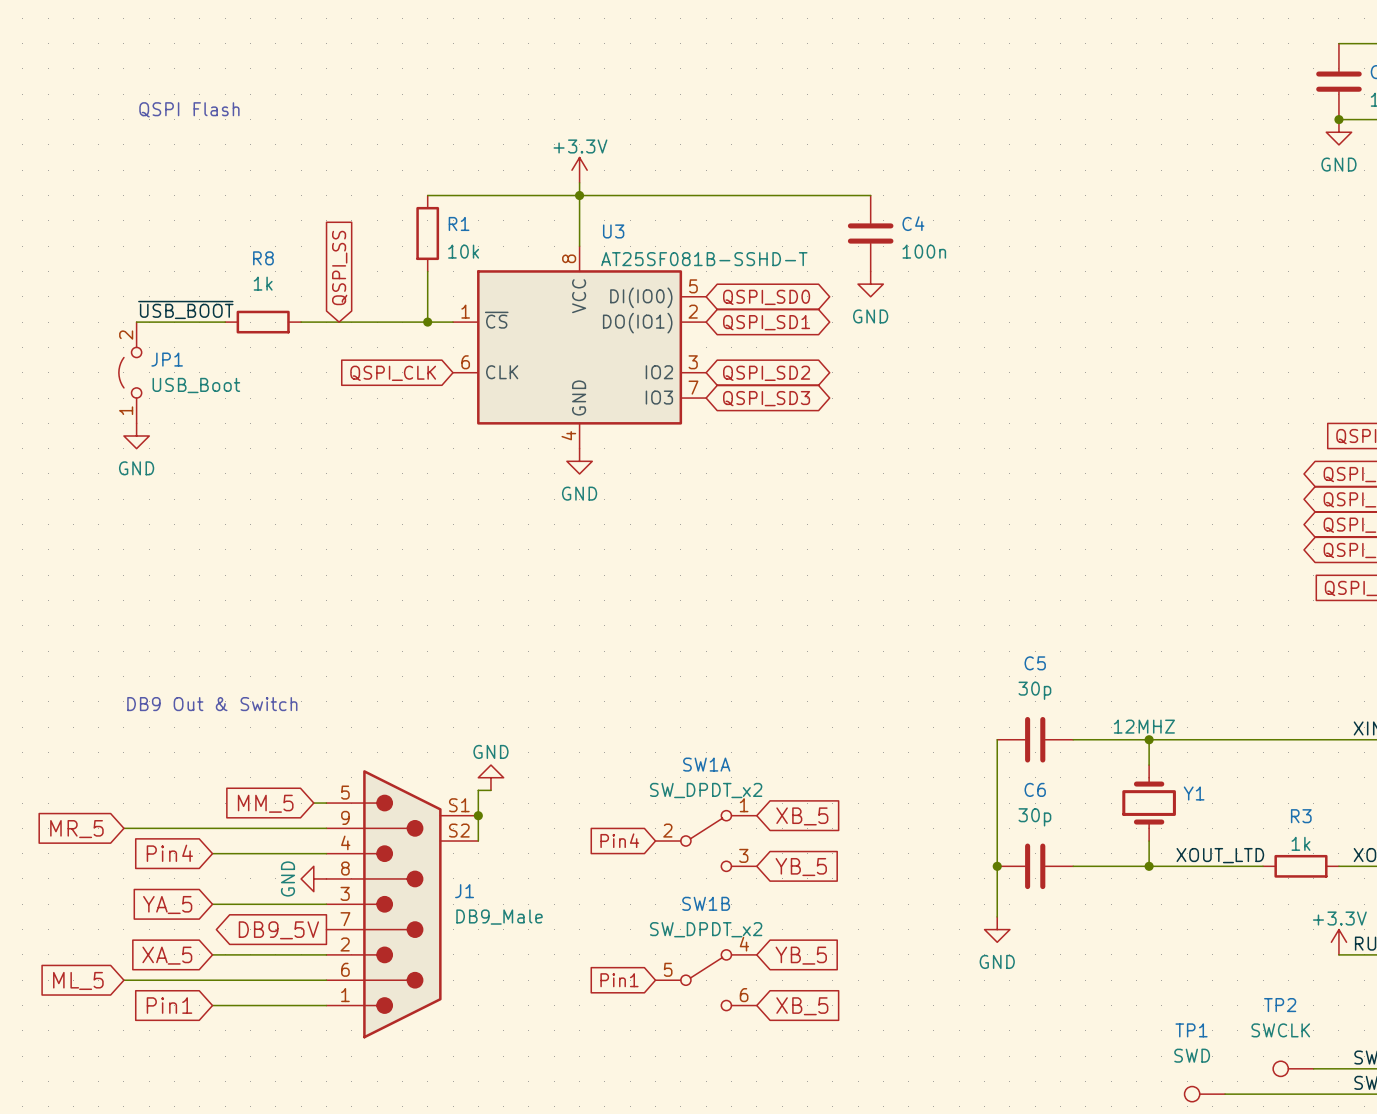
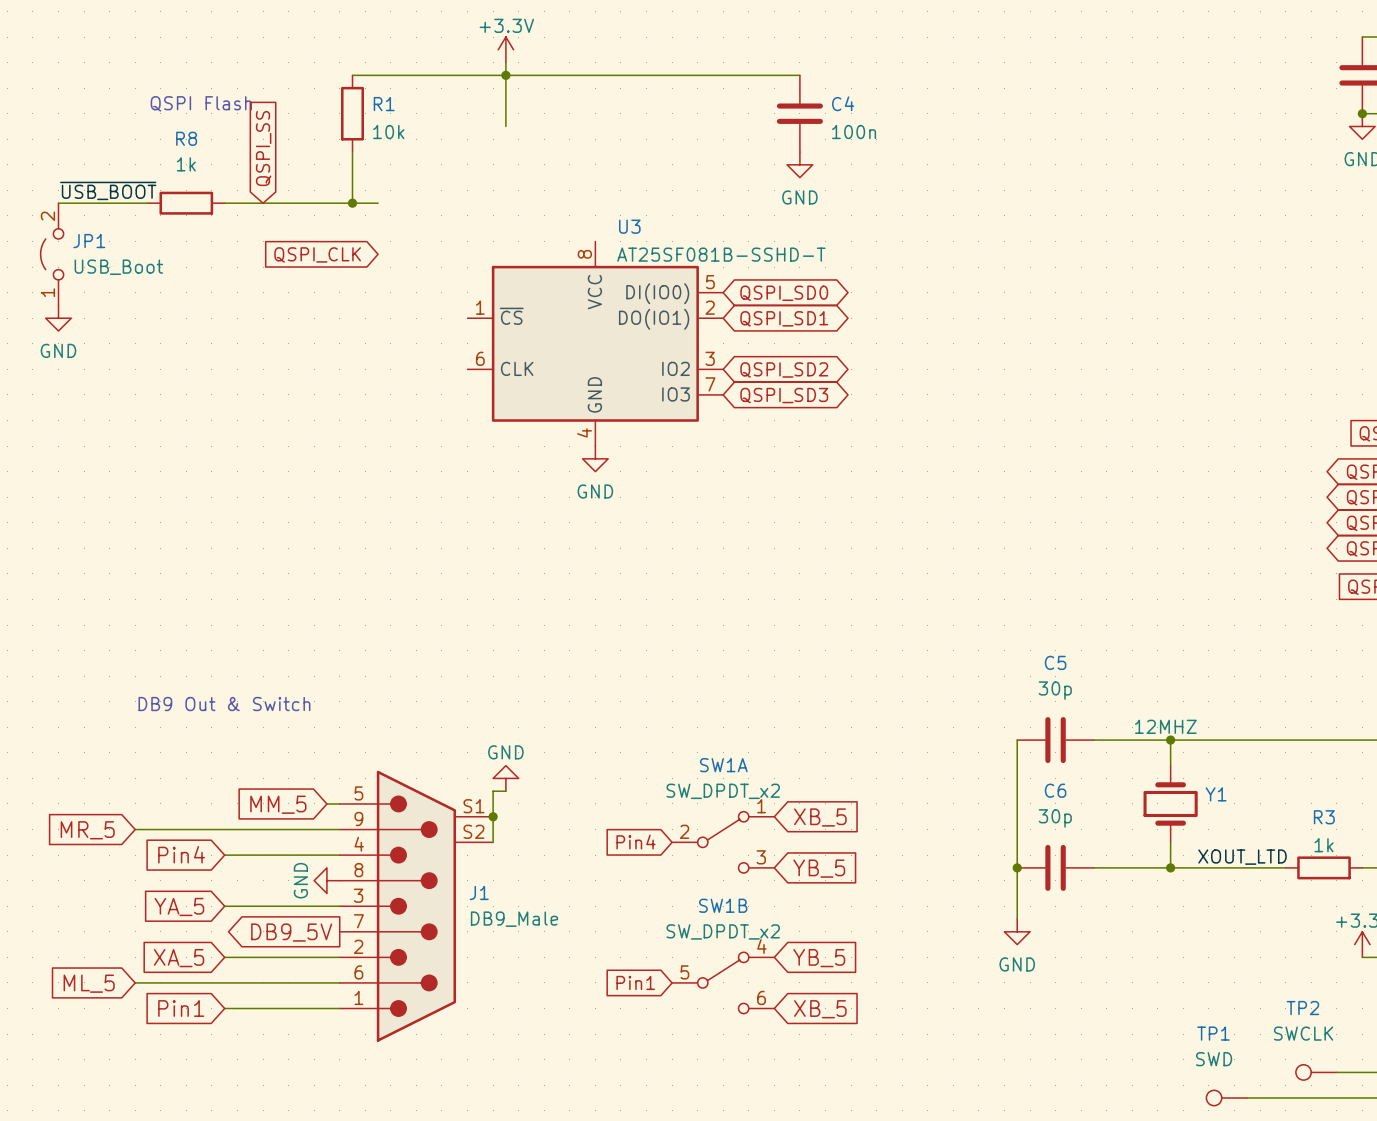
junction: none -> (505, 75)
power symbol position: +3.3V (579, 170) -> +3.3V (505, 49)
wire: (579, 182) (579, 246) -> (505, 62) (505, 126)
wire: (427, 195) (870, 195) -> (352, 75) (799, 75)
junction: (579, 195) -> none
junction: none -> (352, 203)
R1 position: (427, 233) -> (352, 113)
C4 position: (870, 233) -> (799, 113)
global label position: QSPI_SS (339, 267) -> QSPI_SS (263, 148)
wire: (427, 271) (427, 322) -> (352, 152) (352, 203)
power symbol position: GND (870, 284) -> GND (799, 164)
label position: ~{USB_BOOT} (185, 309) -> ~{USB_BOOT} (108, 190)
wire: (136, 322) (225, 322) -> (58, 203) (147, 203)
R8 position: (263, 322) -> (186, 203)
wire: (301, 322) (453, 322) -> (224, 203) (378, 203)
junction: (427, 322) -> none
JP1 position: (130, 372) -> (52, 254)
global label position: QSPI_CLK (393, 373) -> QSPI_CLK (317, 254)
power symbol position: GND (136, 436) -> GND (58, 318)

